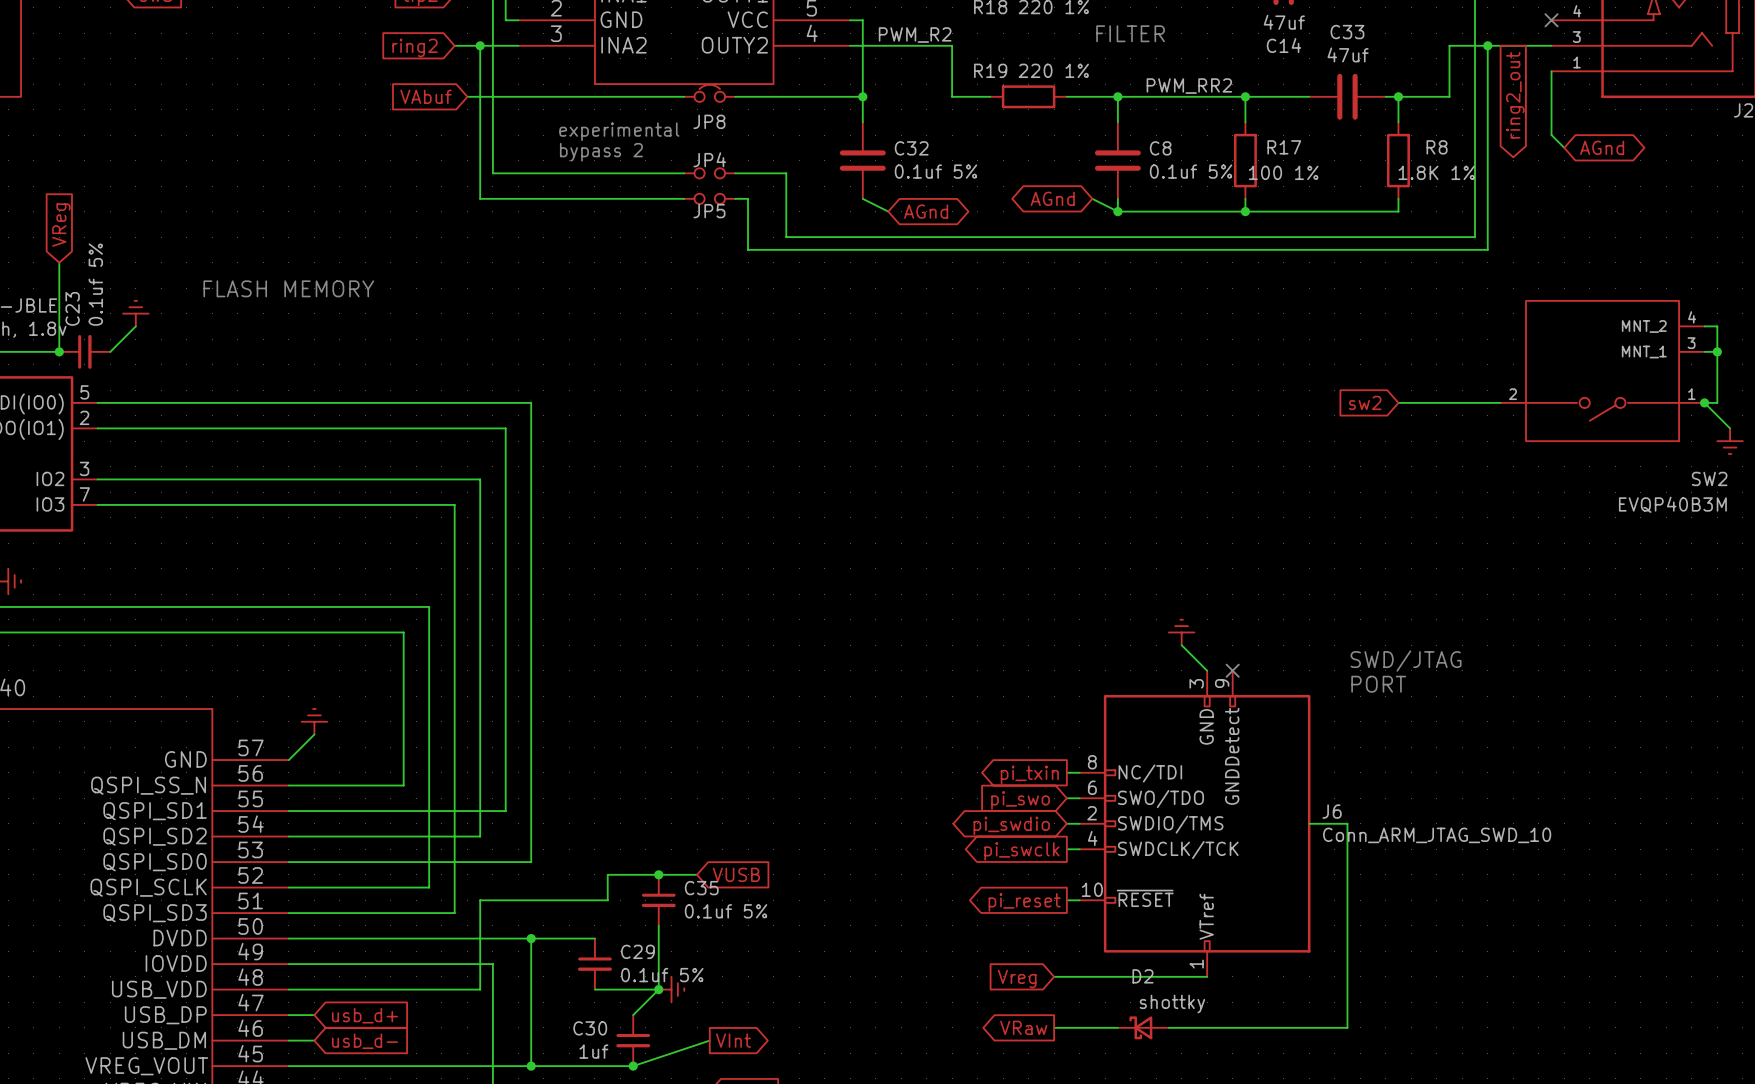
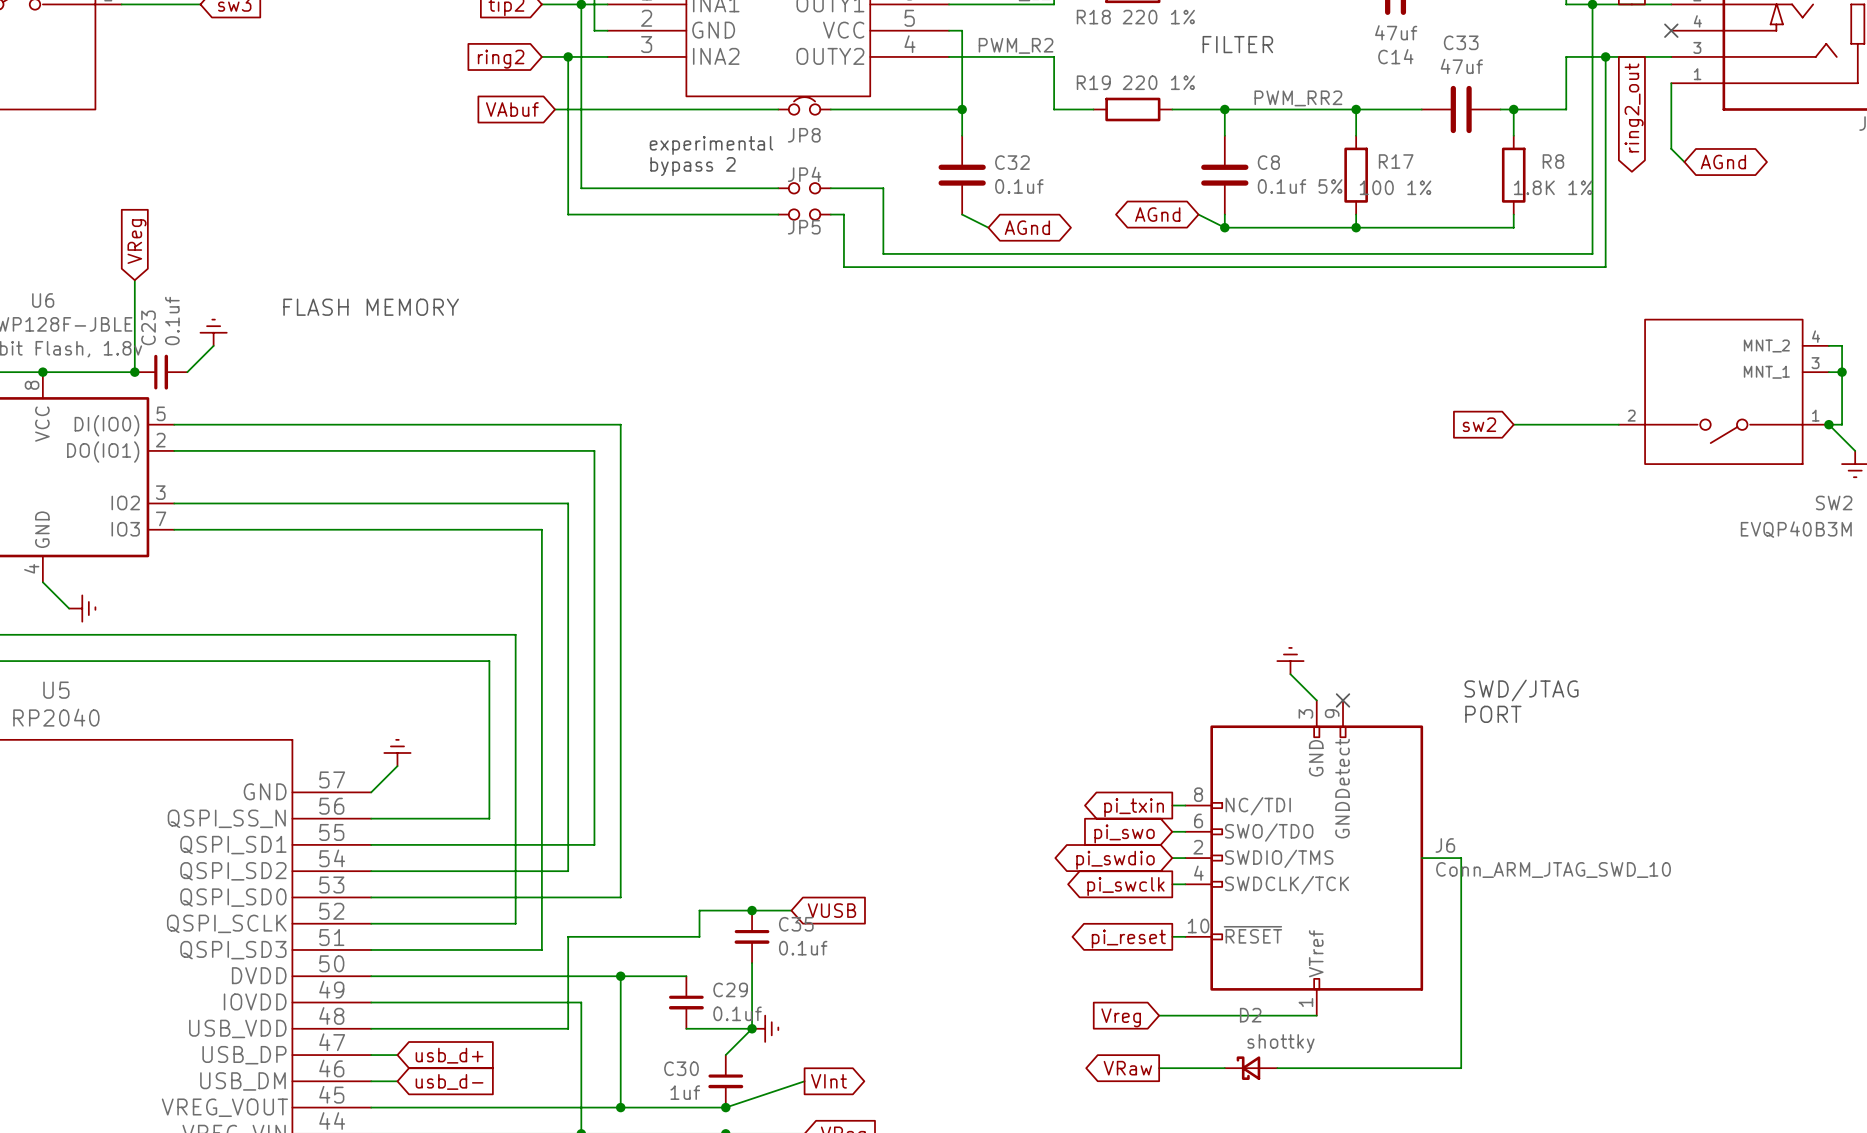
C32 value: 0.1uf 5% (935, 171) -> 0.1uf (1019, 186)
C23 value: 0.1uf 5% (95, 284) -> 0.1uf (172, 321)
C35 value: 0.1uf 5% (726, 911) -> 0.1uf (803, 948)
C29 value: 0.1uf 5% (662, 975) -> 0.1uf (737, 1013)

